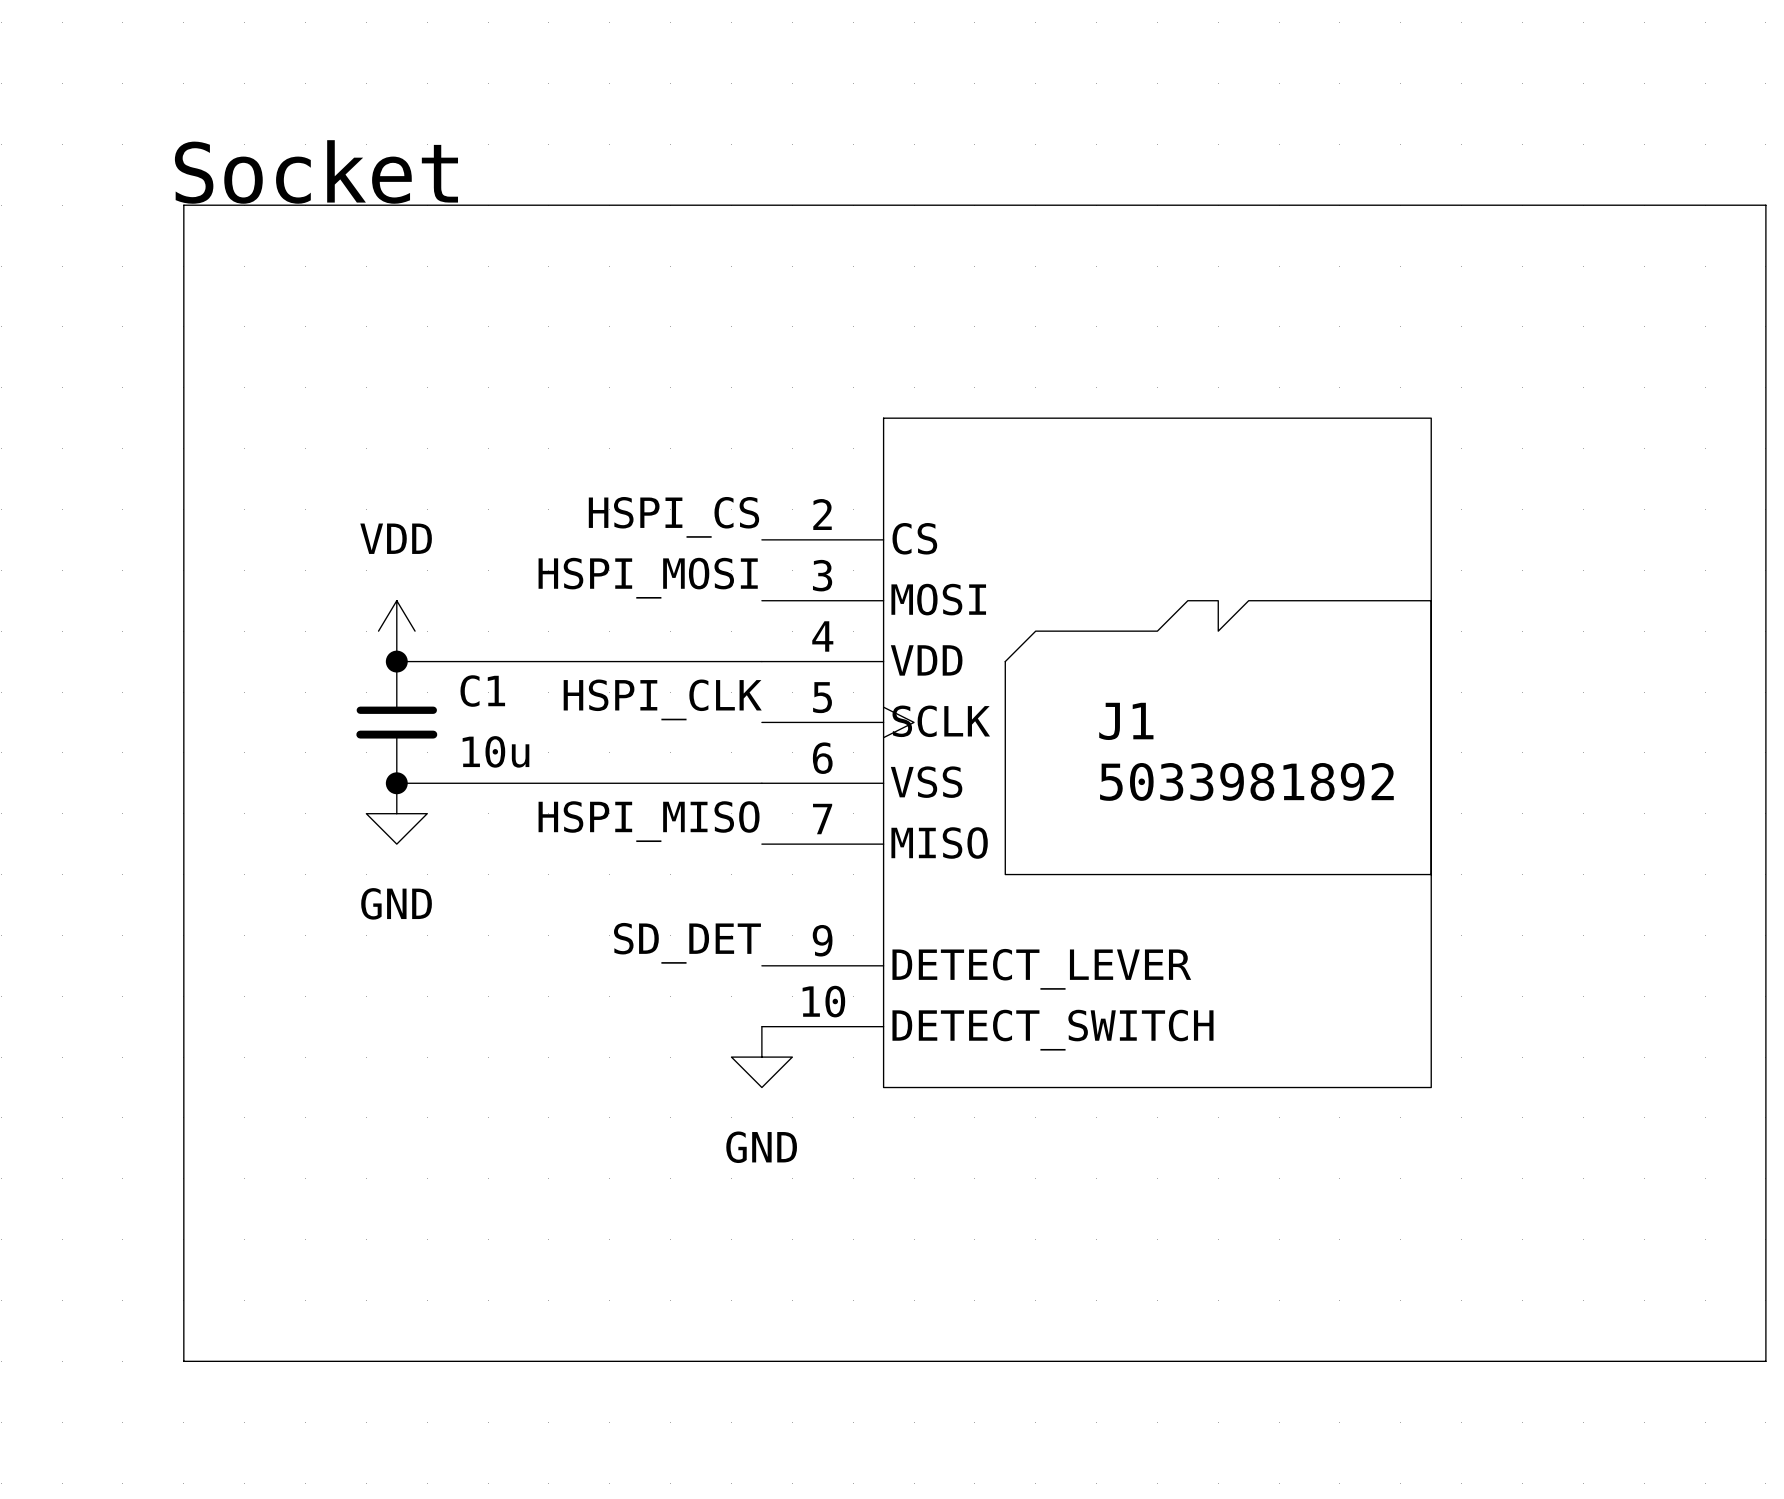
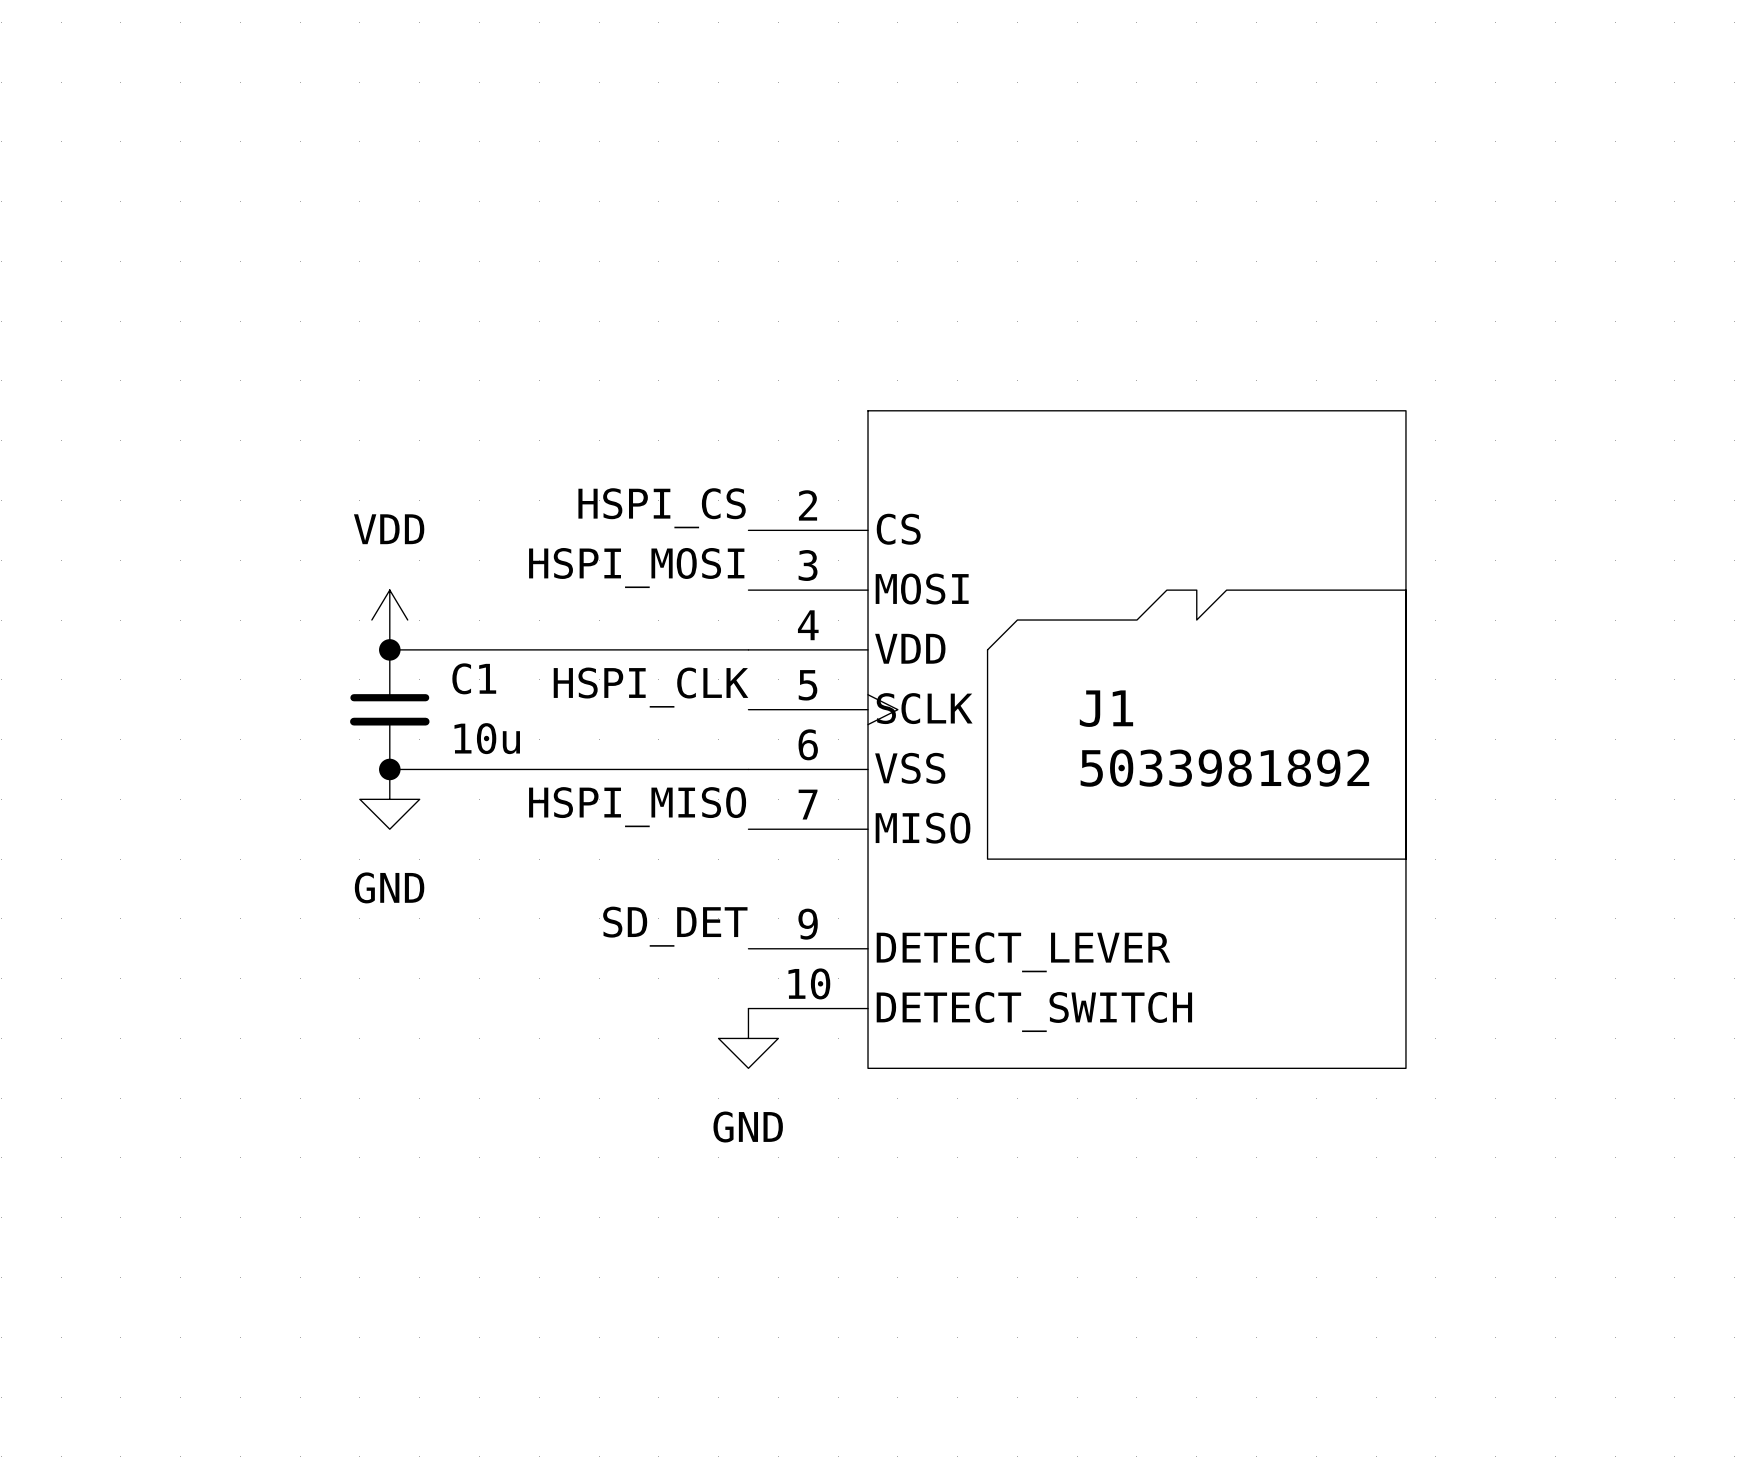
text: Socket (316, 171) -> none
line: (183, 205) (1765, 205) (1765, 1361) (183, 1361) (183, 205) -> none

